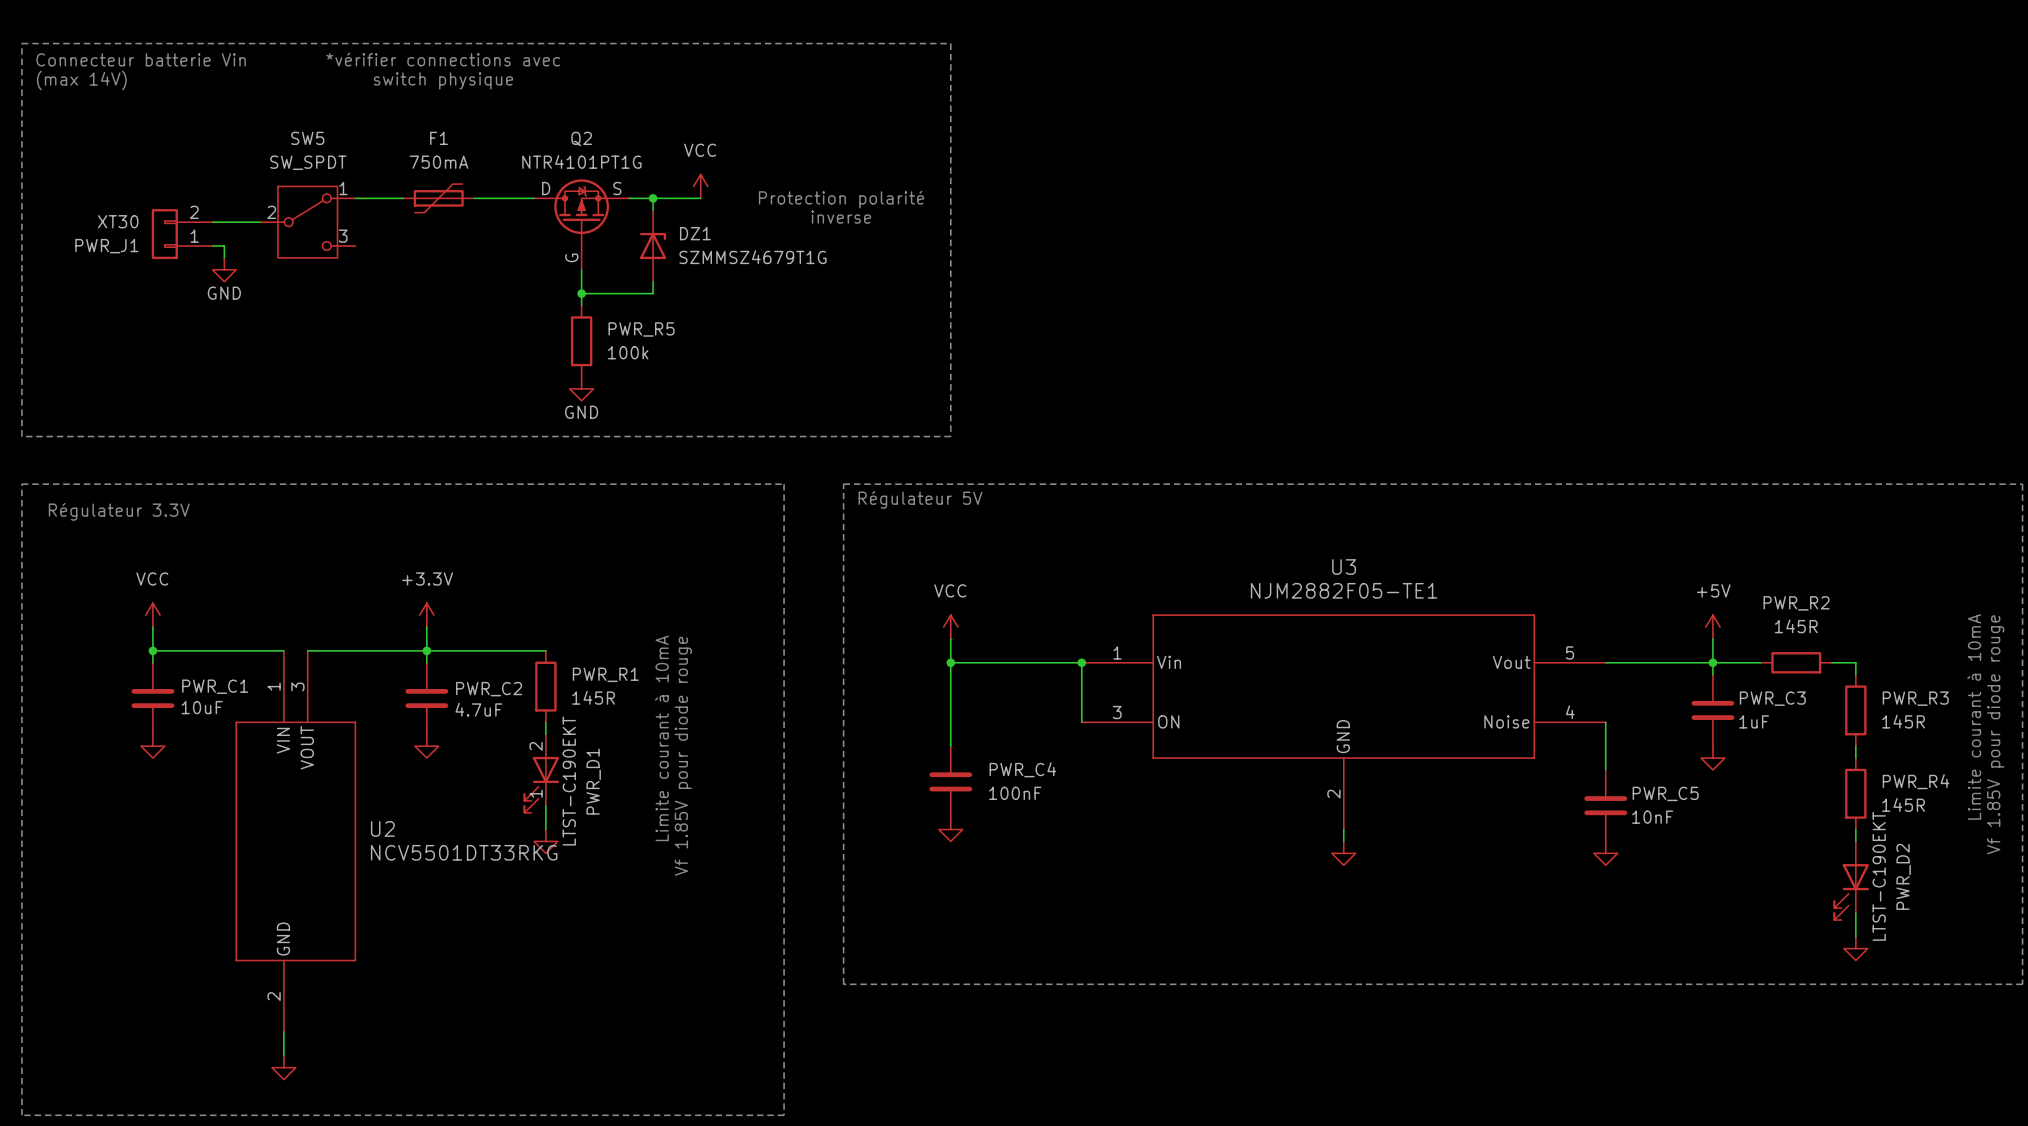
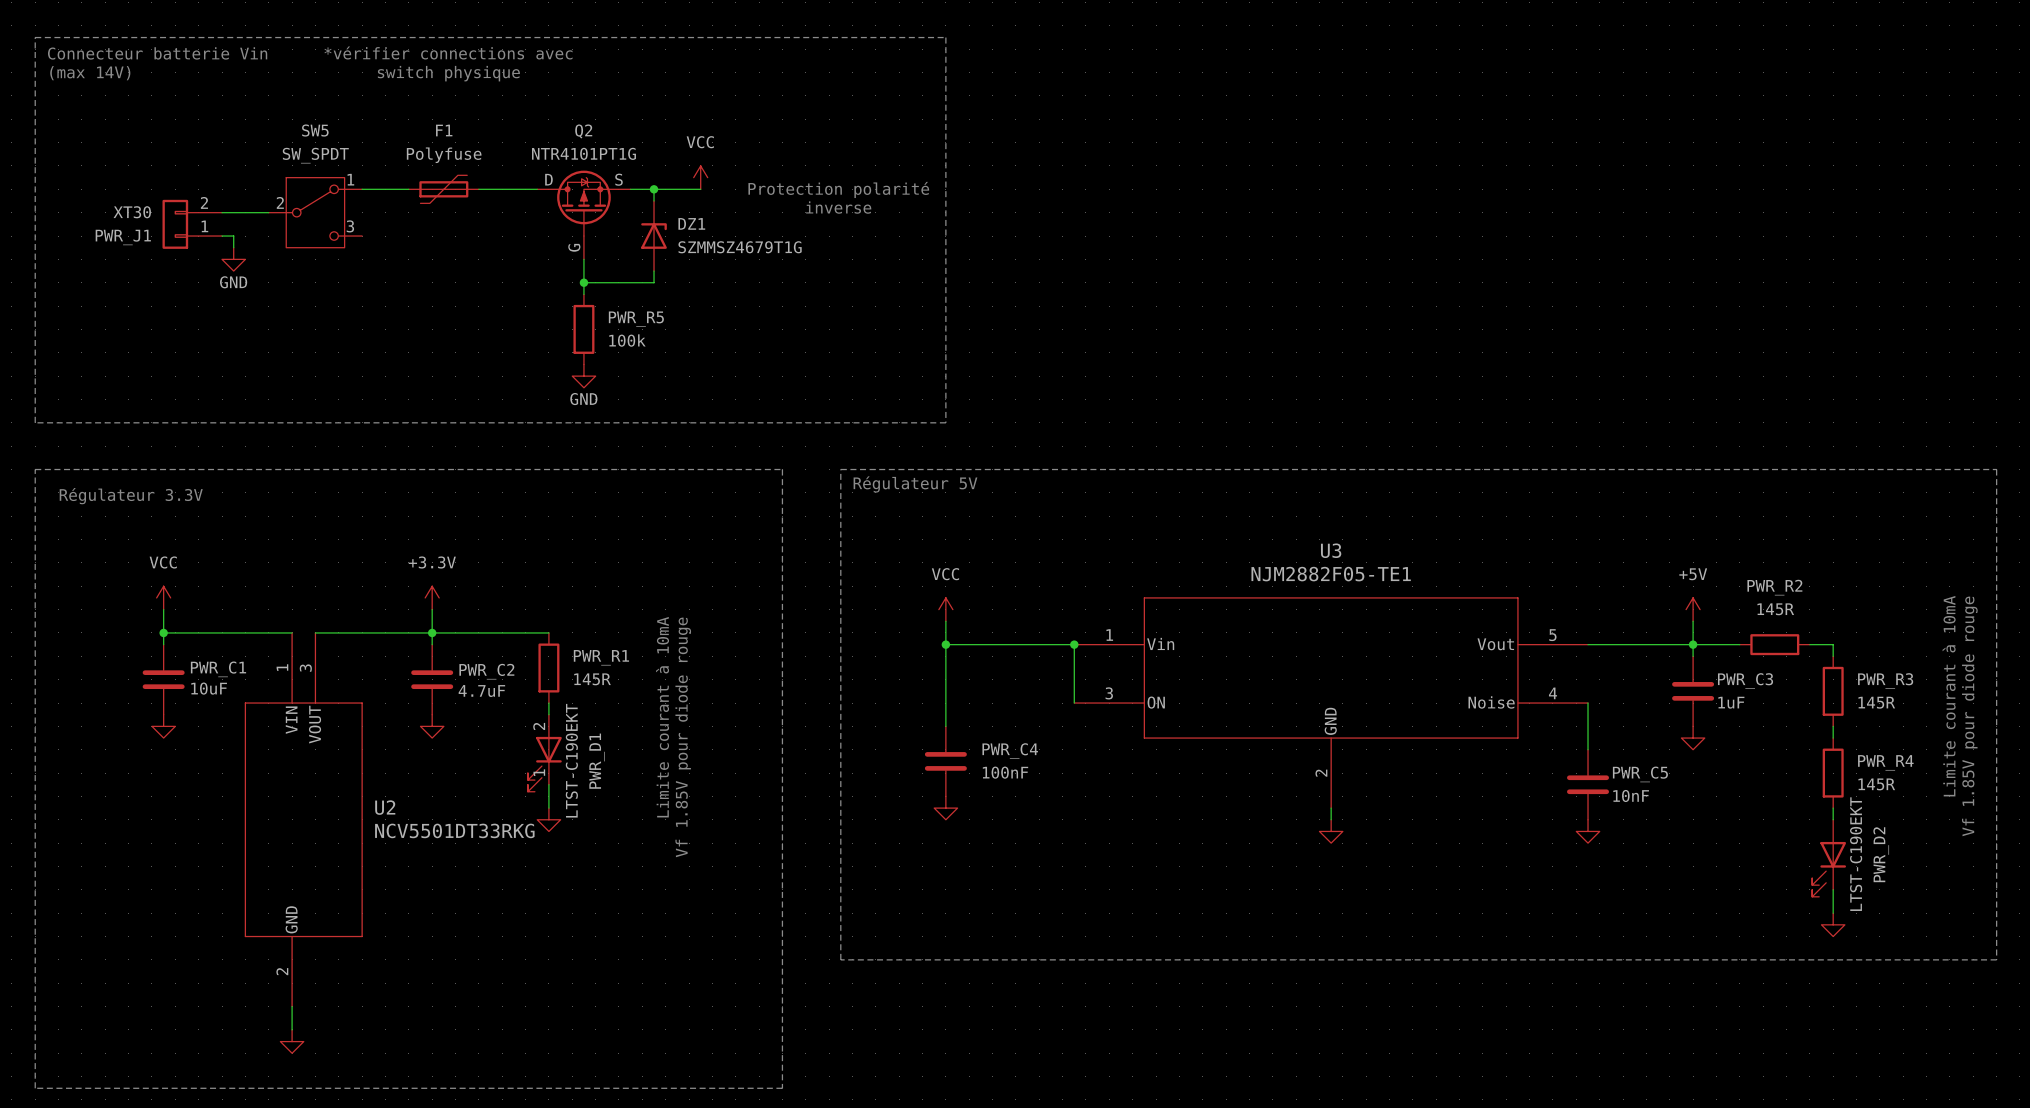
F1 value: 750mA (439, 162) -> Polyfuse (444, 155)

